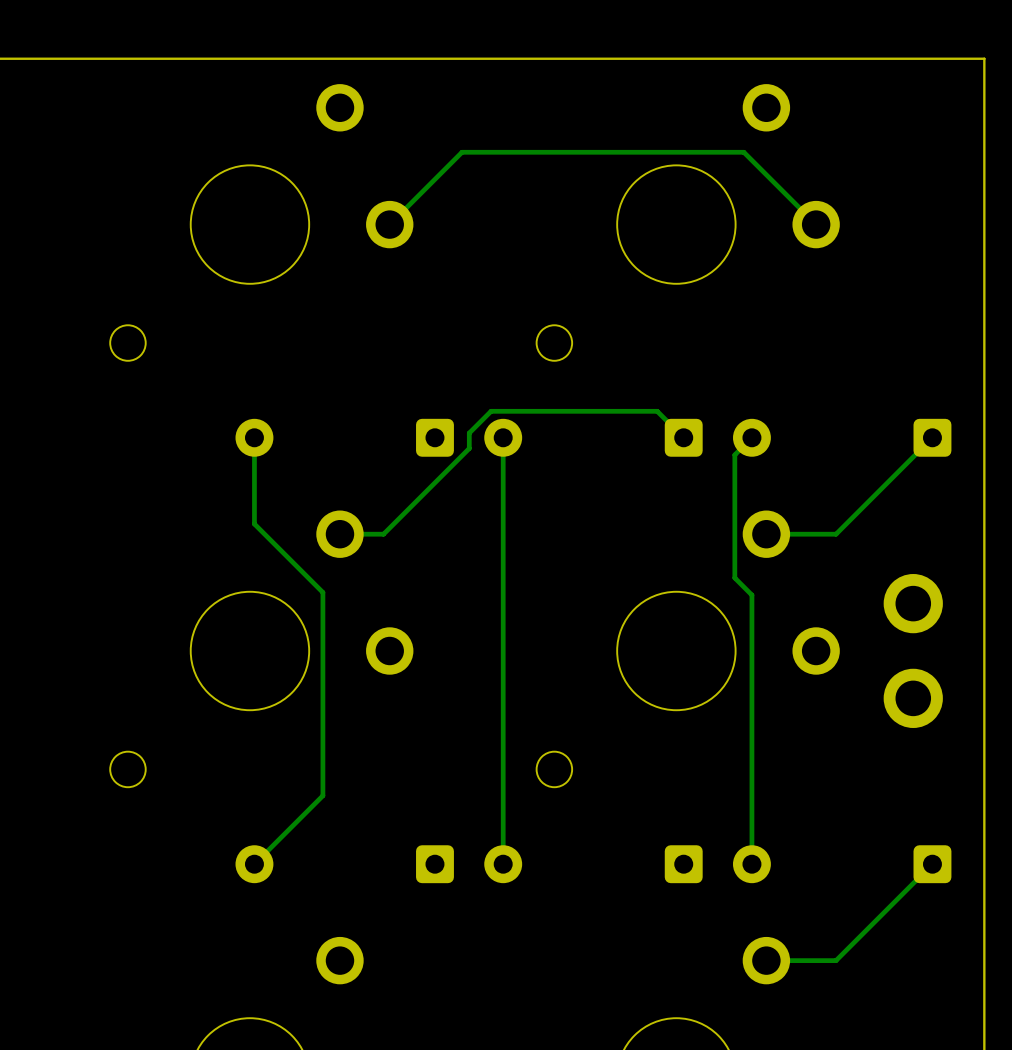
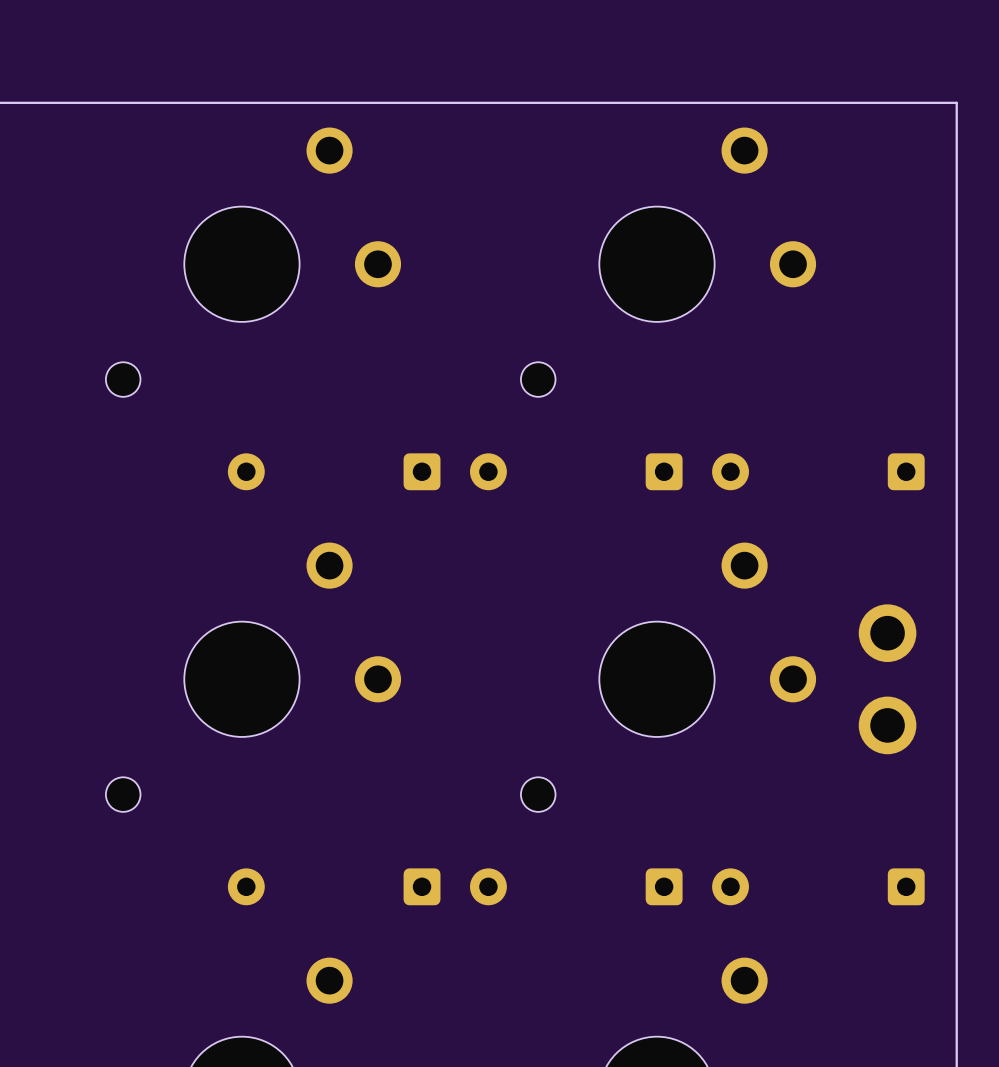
track: (816, 224) (743, 152) (462, 152) (389, 224) -> none
track: (254, 437) (254, 524) (322, 592) (322, 795) (254, 864) -> none
track: (503, 437) (503, 864) -> none
track: (683, 437) (657, 411) (491, 411) (469, 433) (469, 448) (383, 534) (339, 534) -> none
track: (751, 437) (734, 454) (734, 577) (751, 595) (751, 864) -> none
track: (932, 437) (836, 534) (766, 534) -> none
track: (932, 864) (836, 960) (766, 960) -> none

